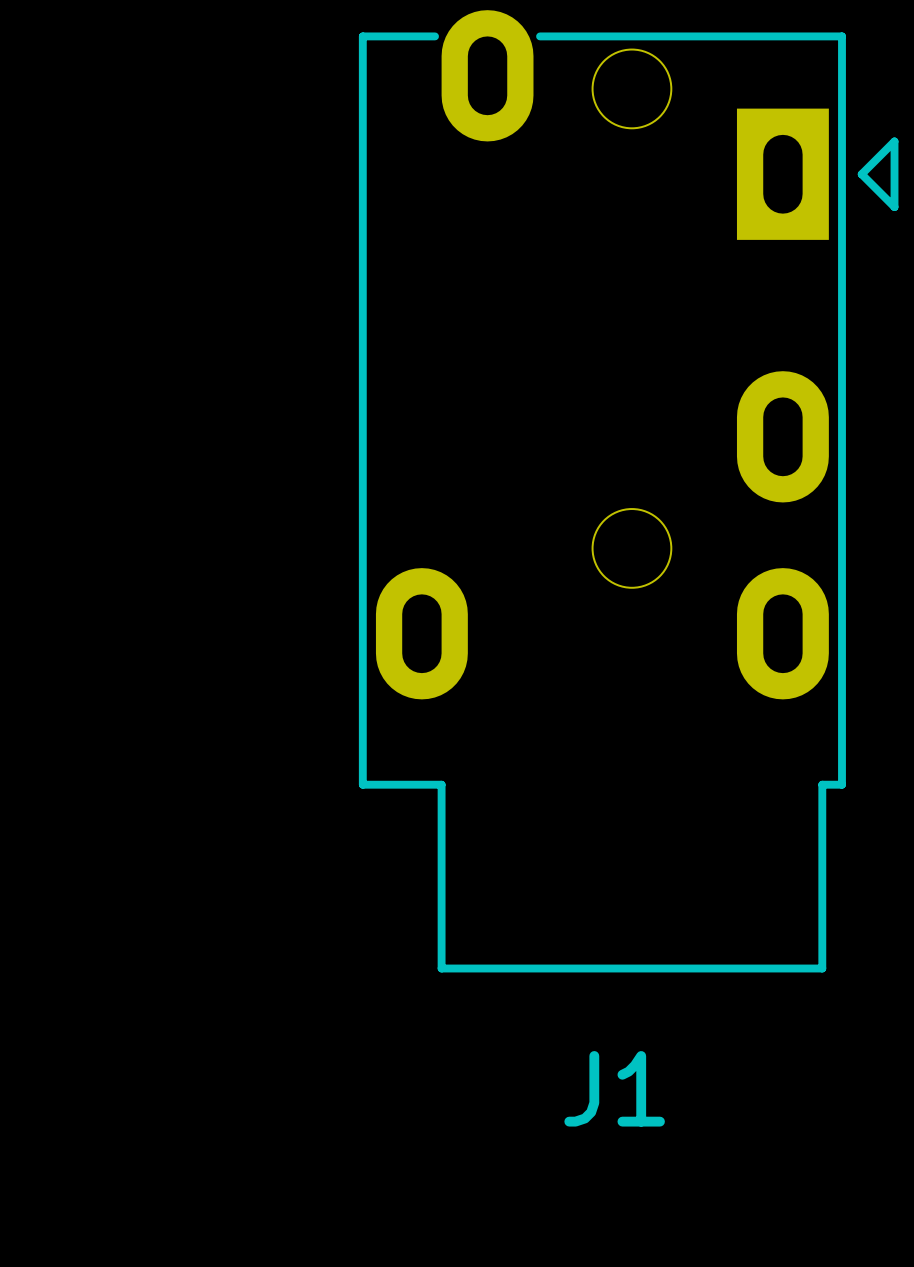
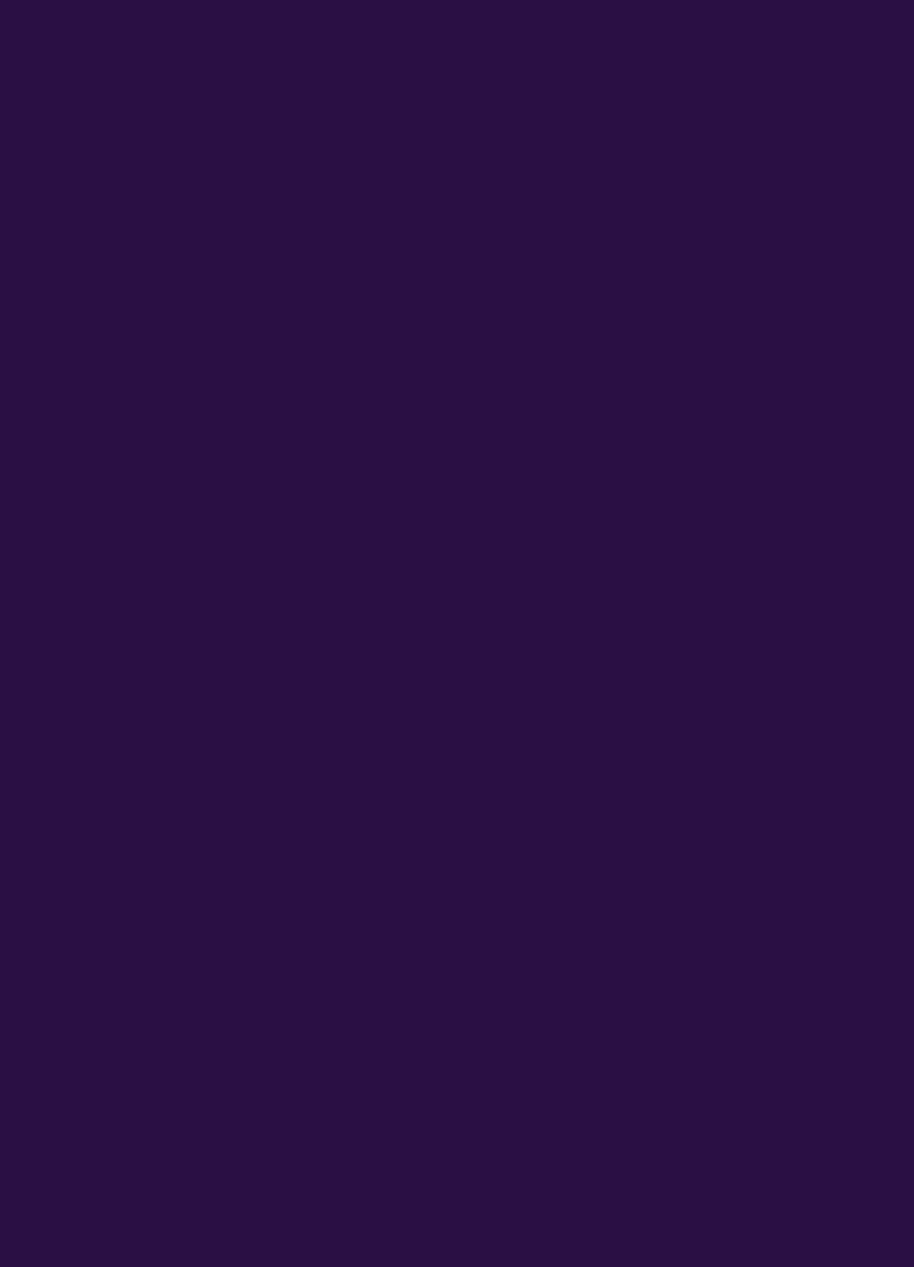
J1: (628, 491) -> none

